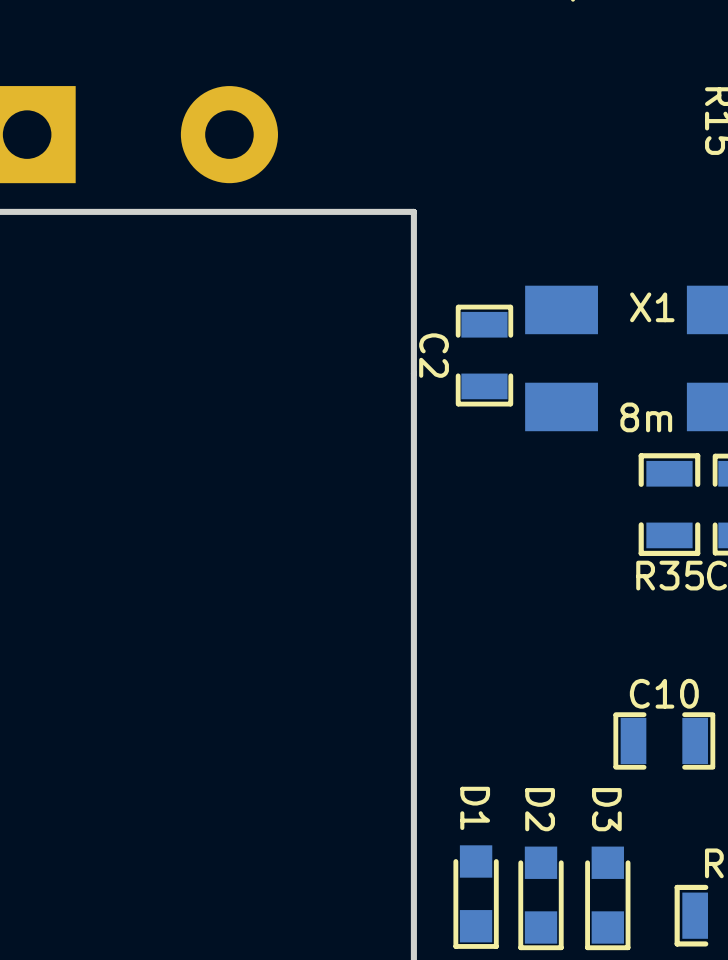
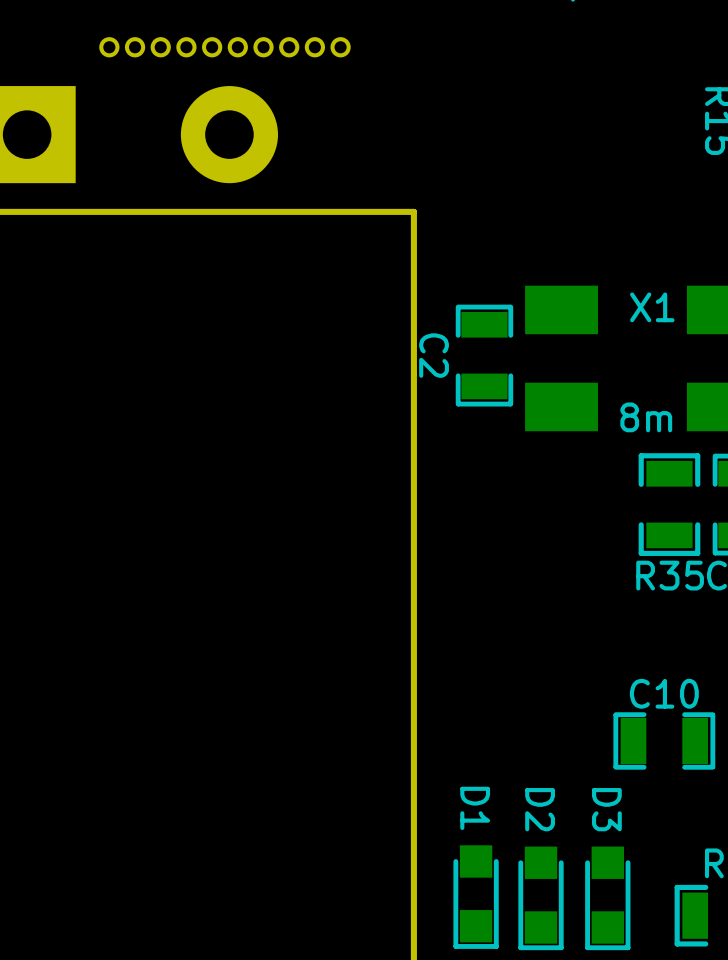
part: none -> (109, 47)
part: none -> (135, 47)
part: none -> (160, 47)
part: none -> (186, 47)
part: none -> (212, 47)
part: none -> (237, 47)
part: none -> (263, 47)
part: none -> (289, 47)
part: none -> (314, 47)
part: none -> (340, 47)

